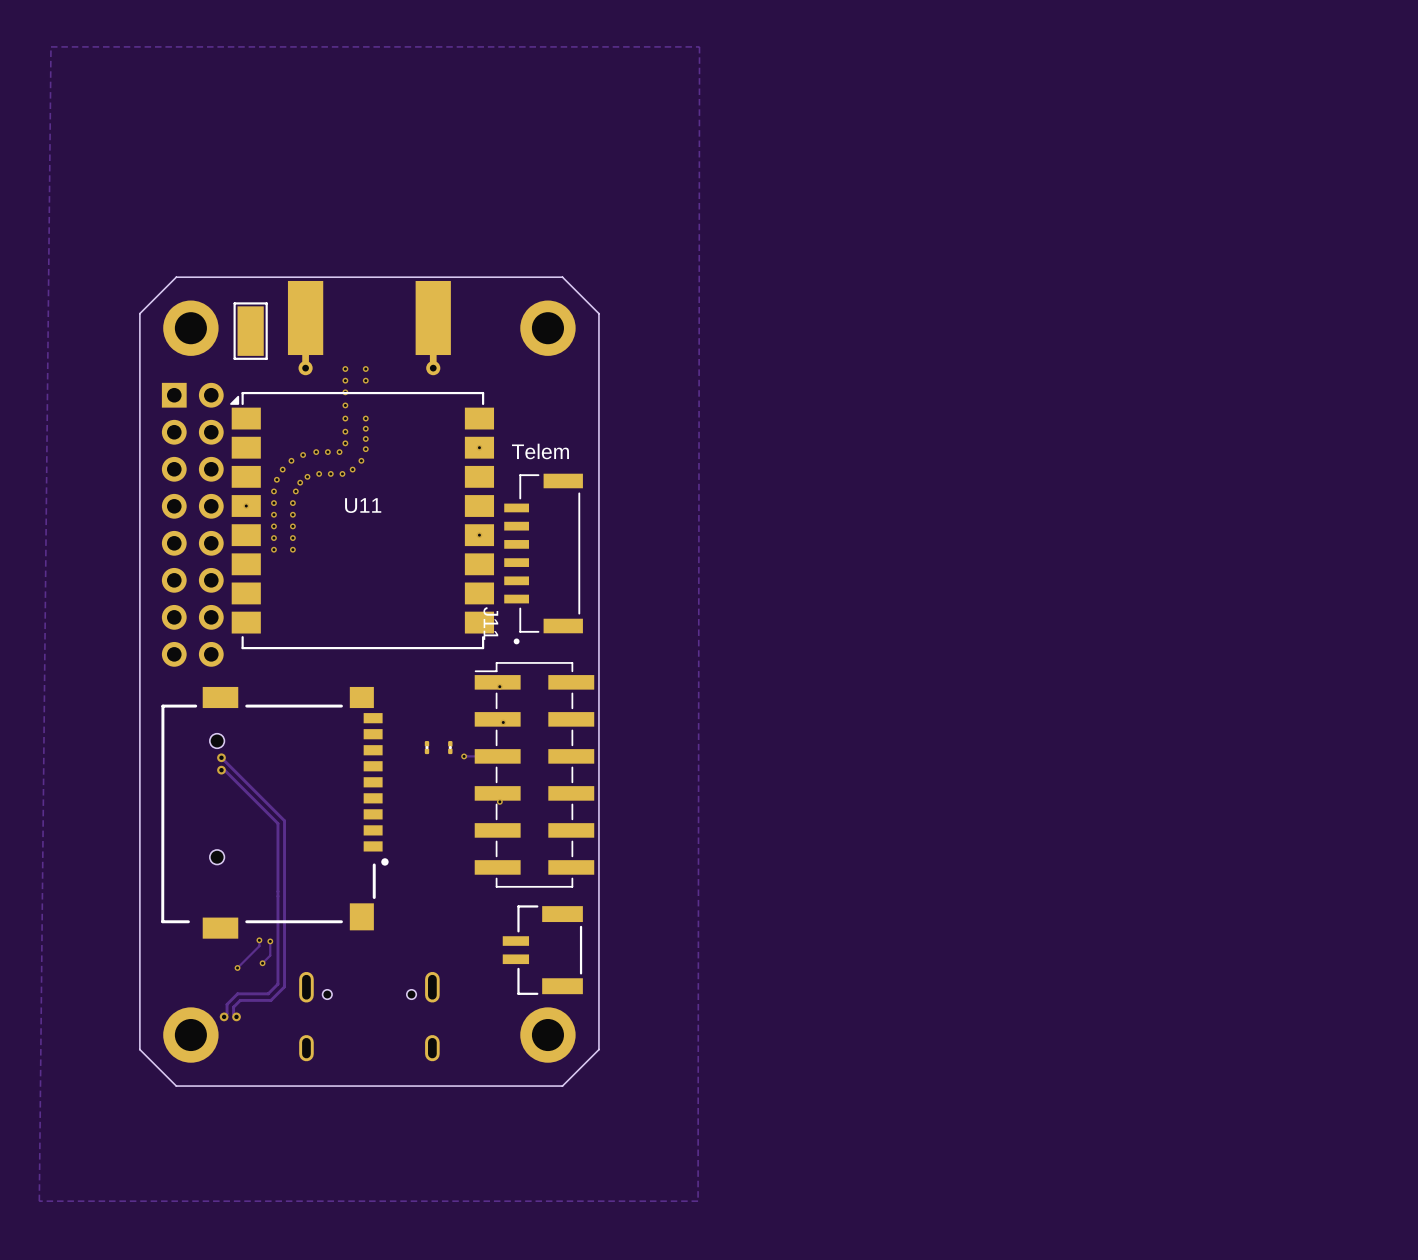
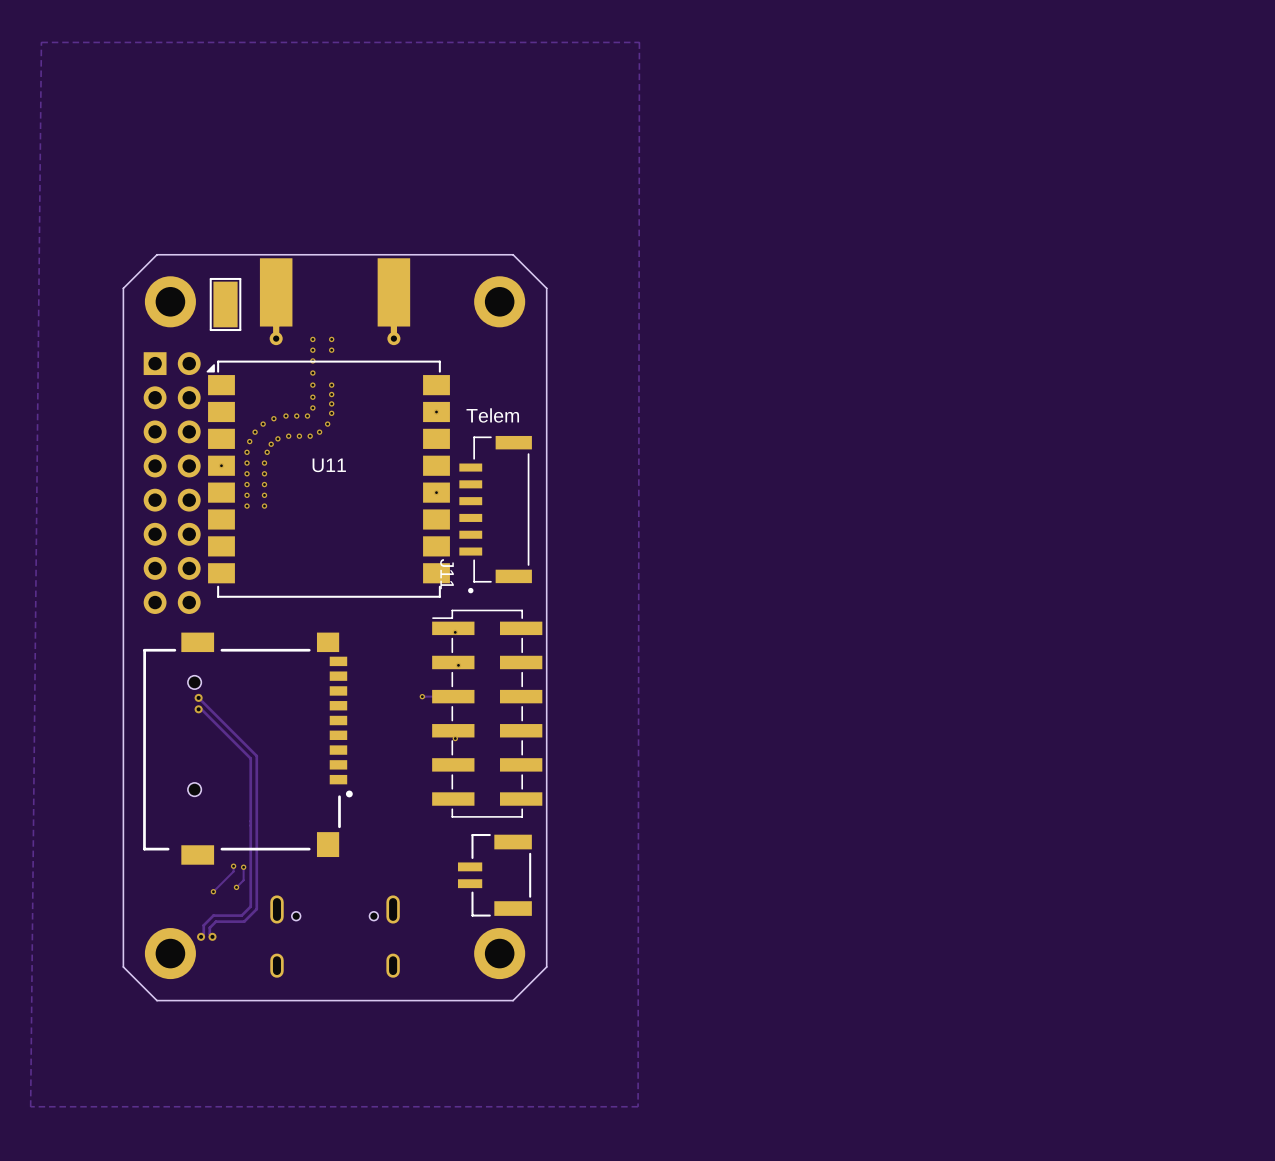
part: (426, 747) -> none
part: (450, 747) -> none

